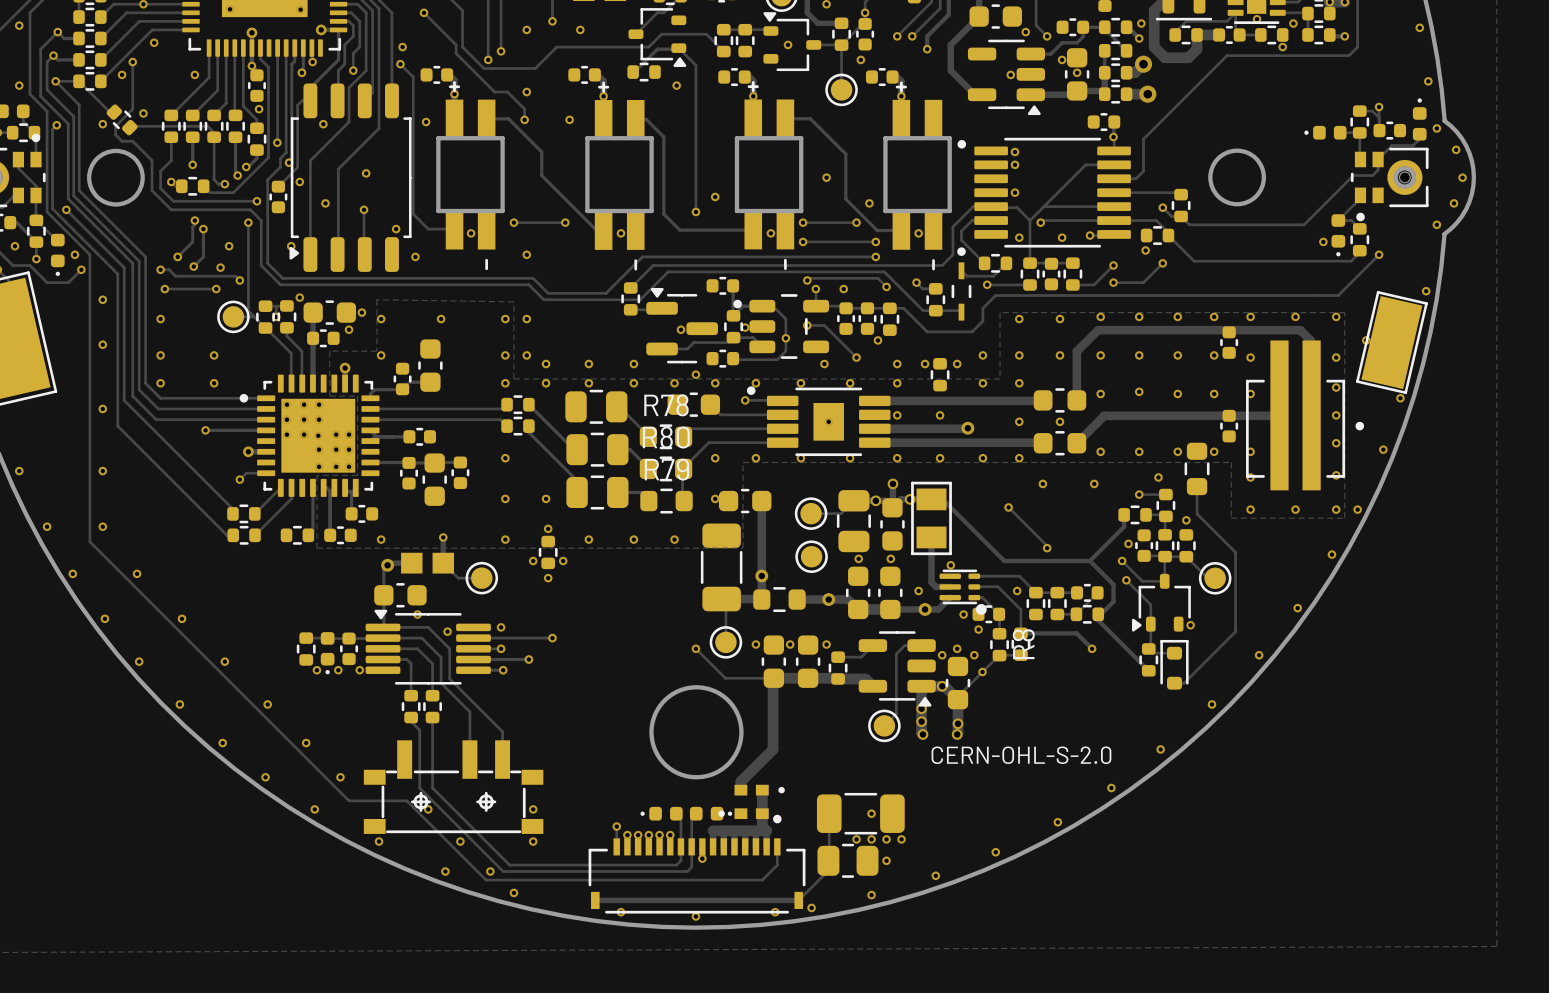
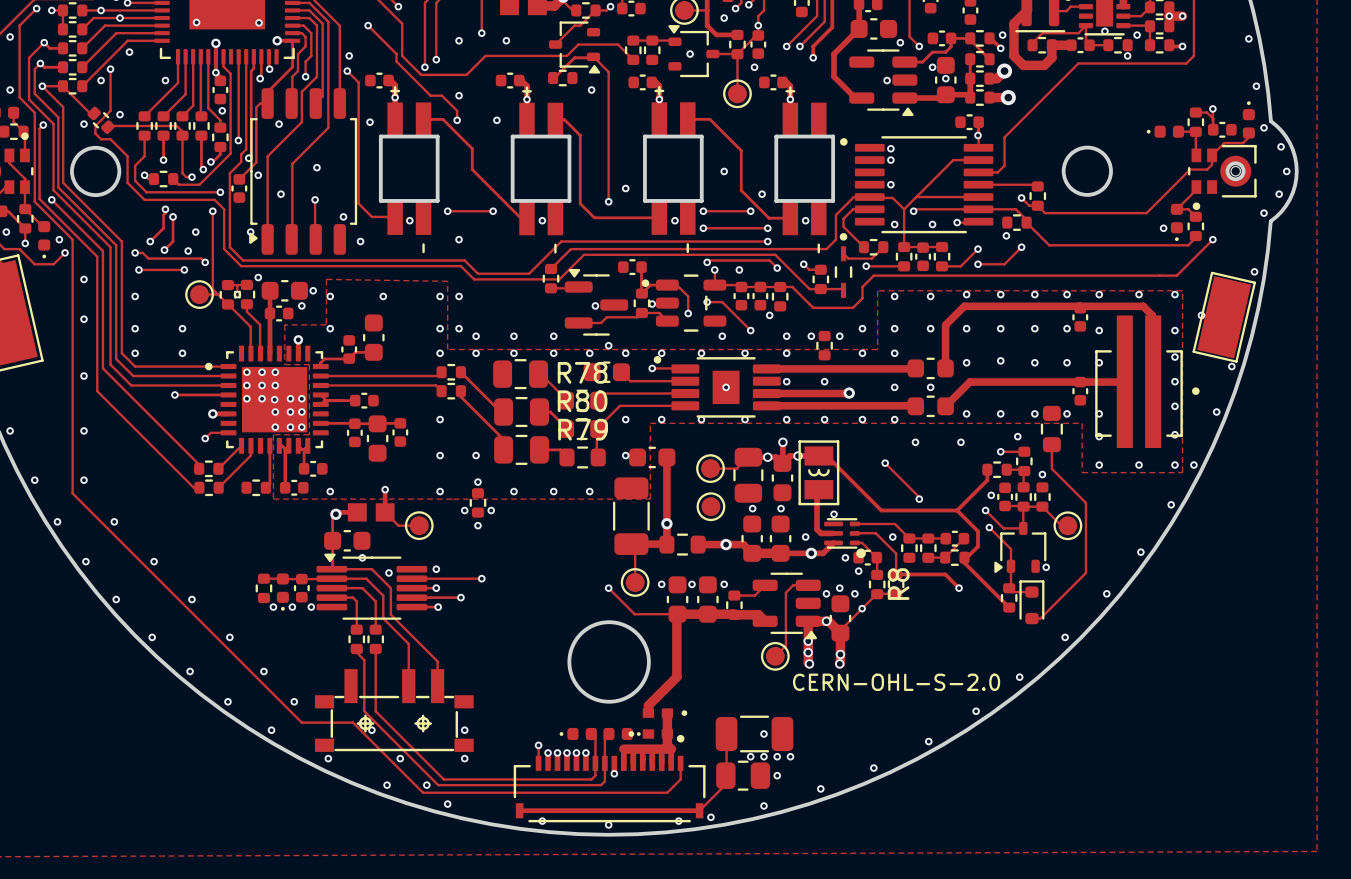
track: (785, 338) (785, 351) (777, 359) (733, 359) -> none
part: (722, 358) -> none
part footprint: [911, 481, 952, 556] -> [798, 440, 840, 506]

